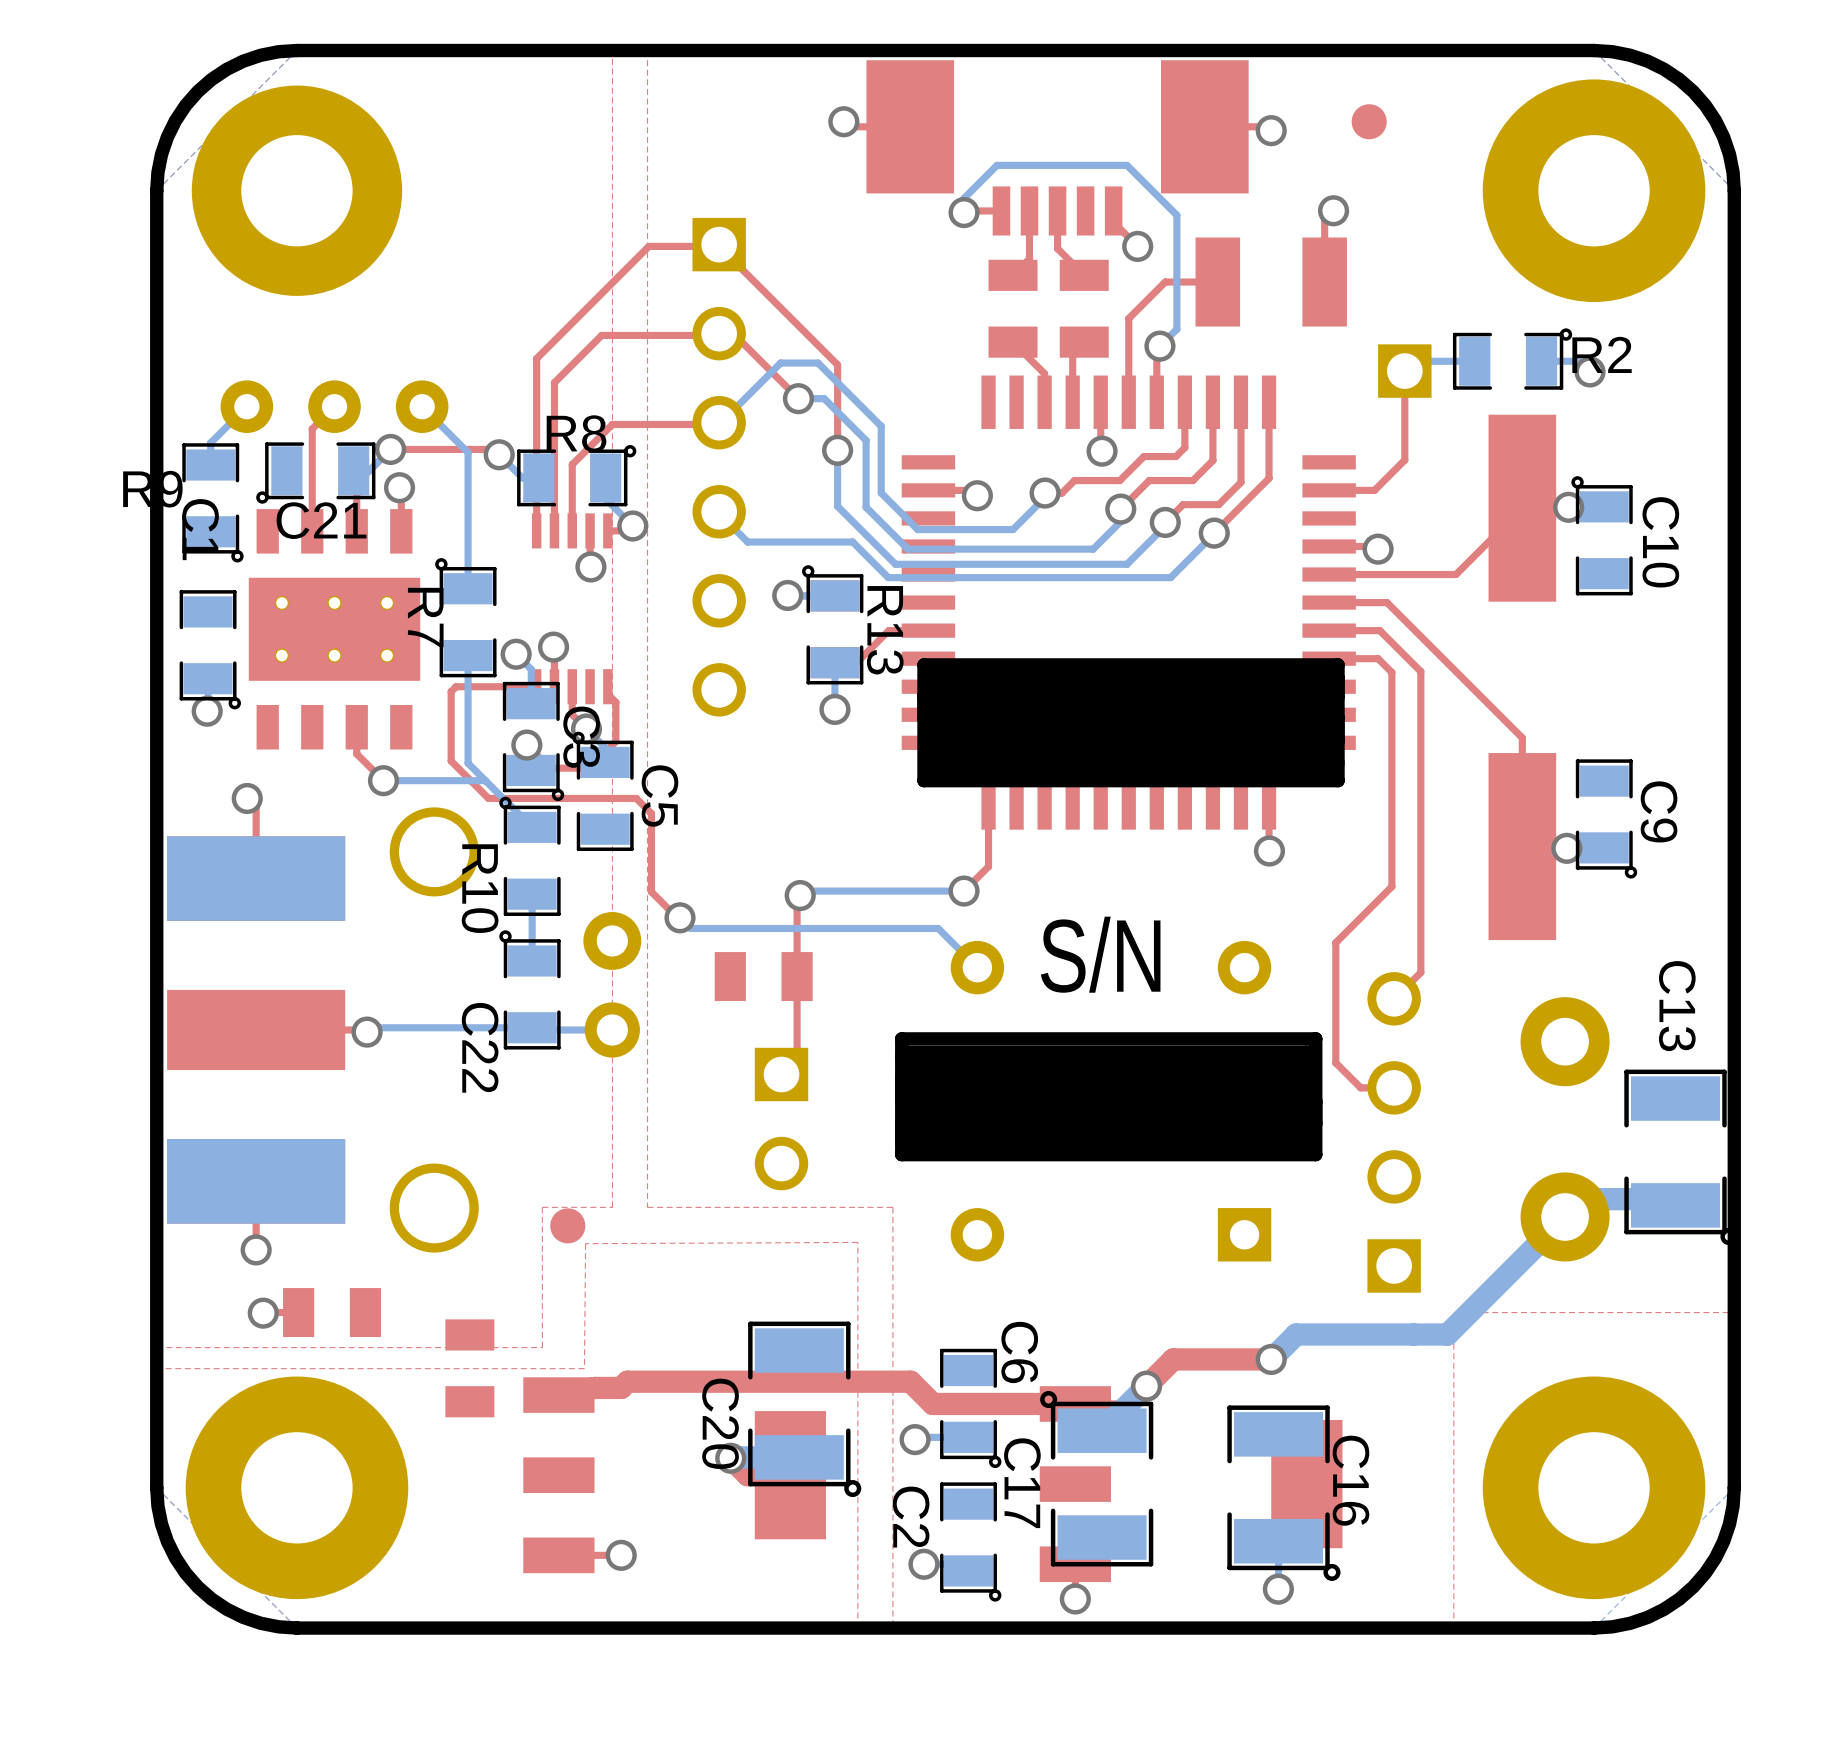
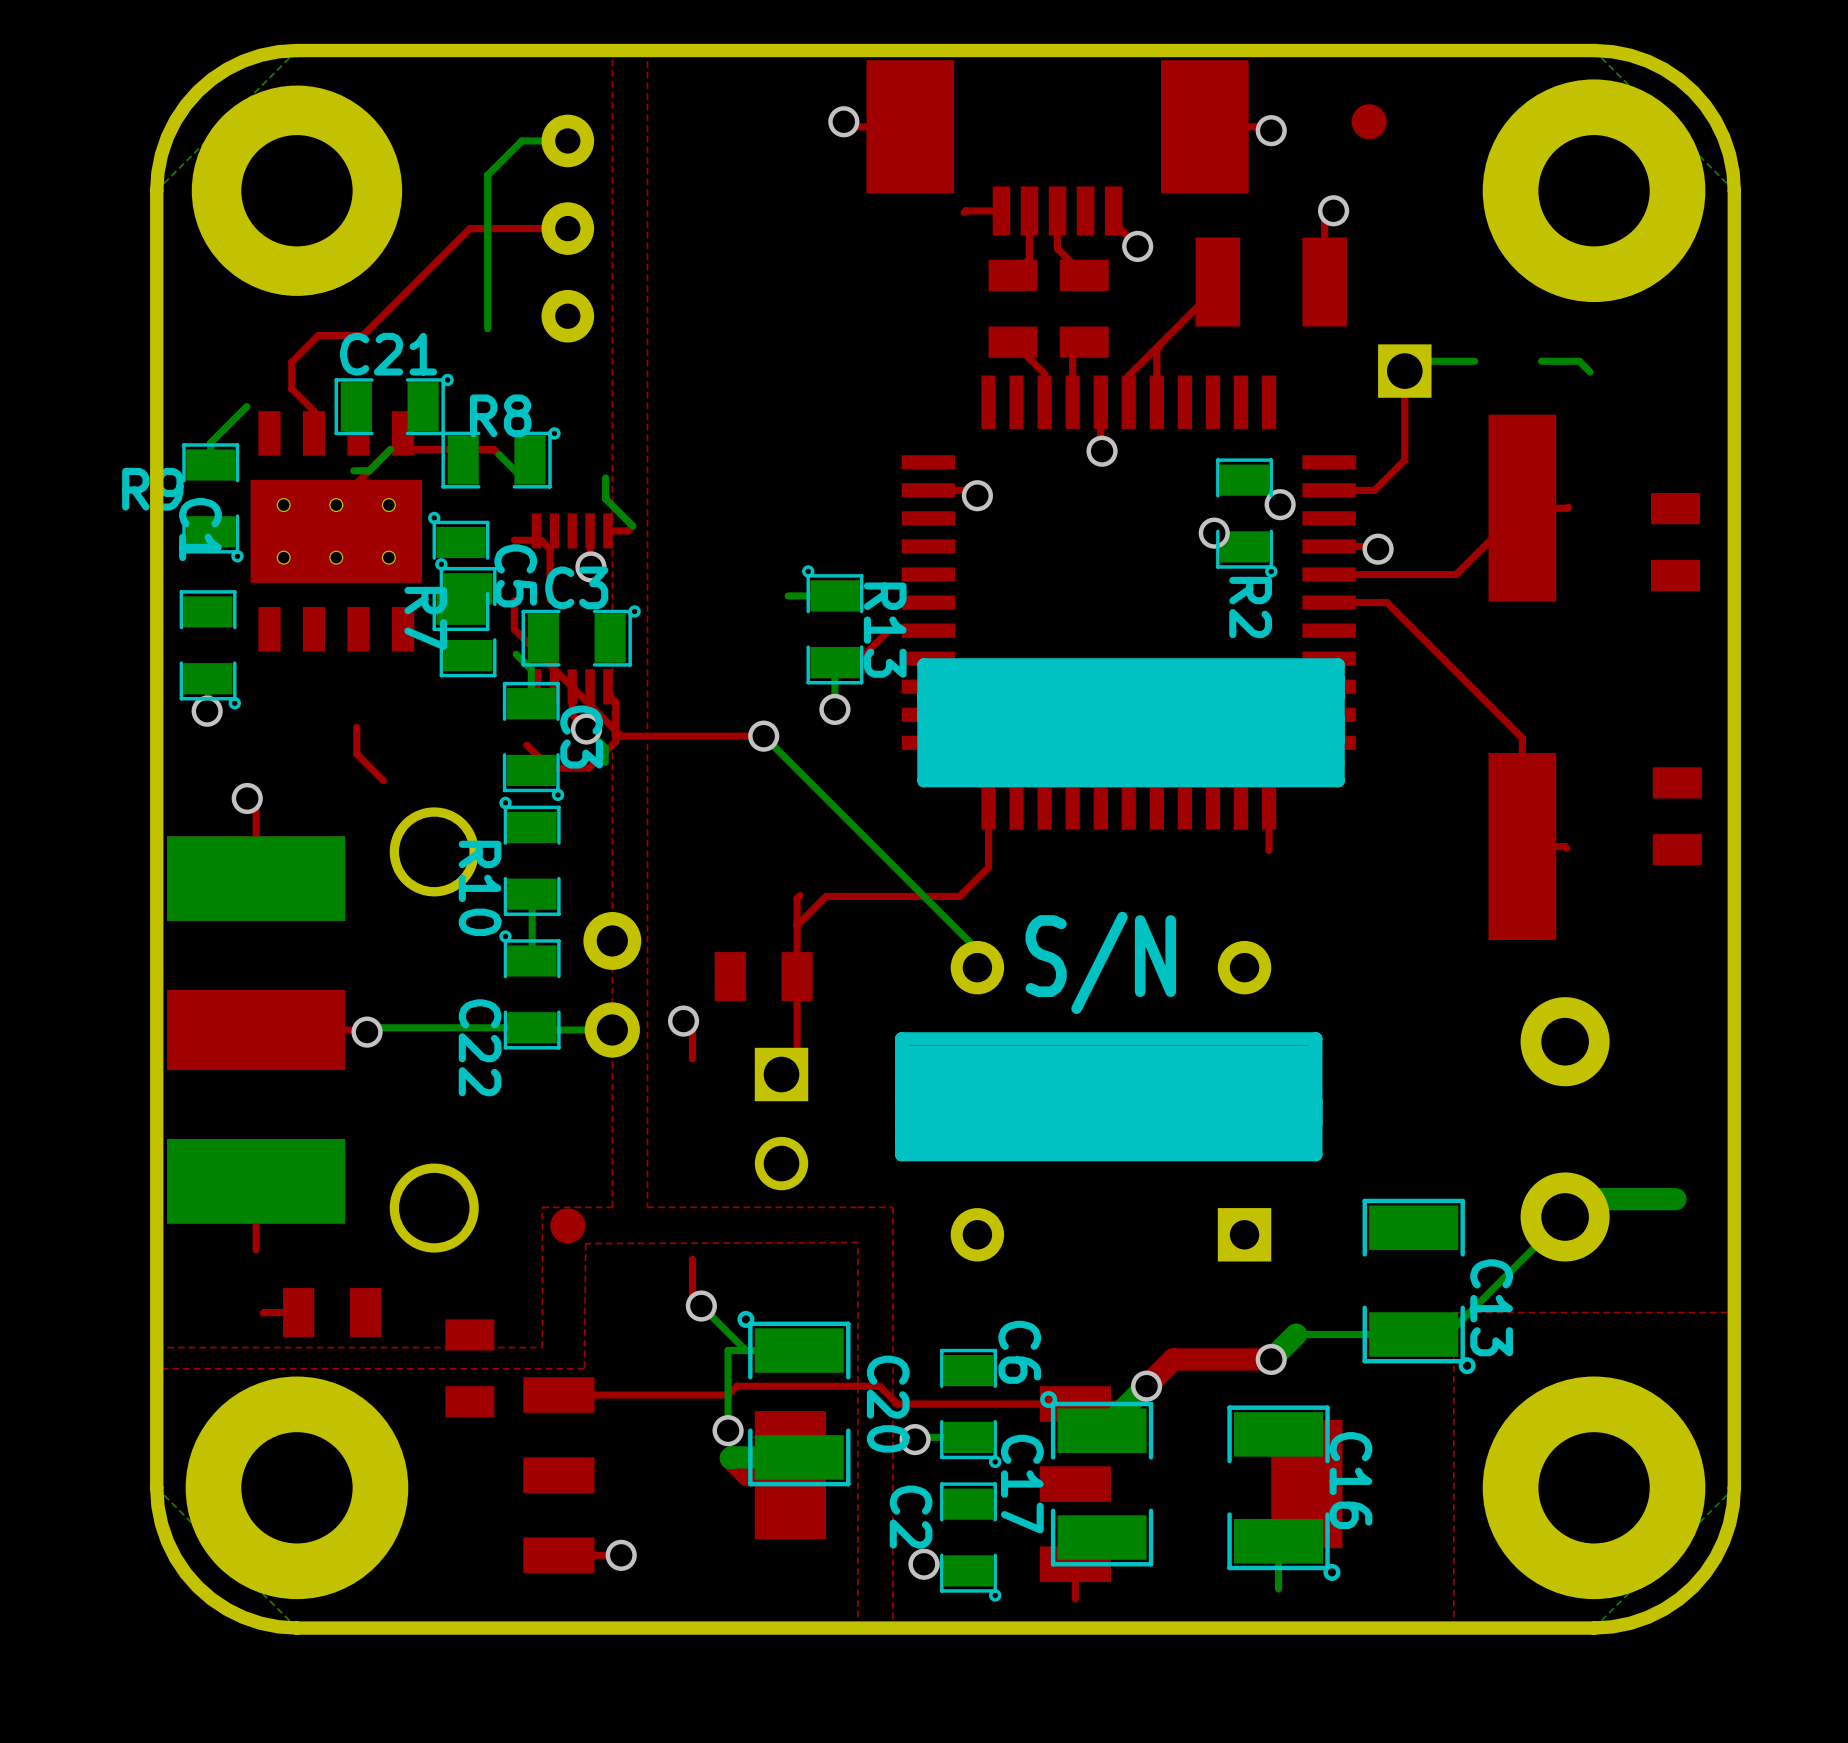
bottom track: none -> (567, 140) (521, 140) (487, 175) (487, 328)
bottom track: (964, 212) (964, 198) (997, 165) (1127, 165) (1176, 215) (1176, 329) (1159, 346) -> none
via: (964, 212) -> none
top track: none -> (567, 228) (469, 228) (363, 335) (318, 335) (291, 362) (291, 388) (314, 411) (314, 433)
top track: (1217, 282) (1165, 282) (1128, 318) (1128, 375) -> (1217, 282) (1217, 286) (1128, 375)
via: (1159, 346) -> none
R2 rotation: 0° (1512, 359) -> 90° clockwise (1246, 517)
R2 position: (1512, 359) -> (1246, 517)
via: (1590, 371) -> none
top track: (798, 398) (735, 335) (601, 335) (554, 382) (554, 530) -> none
bottom track: (798, 398) (824, 398) (866, 440) (866, 507) (907, 549) (1093, 549) (1120, 521) (1120, 509) -> none
via: (798, 398) -> none
top track: (1184, 402) (1184, 447) (1175, 456) (1143, 456) (1119, 480) (1074, 480) (1062, 493) (1045, 493) -> none
top track: (1212, 402) (1212, 460) (1192, 480) (1149, 480) (1120, 509) -> none
top track: (1240, 402) (1240, 482) (1218, 504) (1183, 504) (1165, 522) -> none
top track: (1269, 402) (1269, 478) (1214, 533) -> none
top track: (334, 406) (312, 428) (312, 531) -> none
part rotation: 0° (334, 406) -> 90° clockwise (567, 228)
part position: (334, 406) -> (567, 228)
bottom track: (422, 406) (468, 452) (468, 588) -> none
top track: (719, 424) (612, 424) (572, 464) (572, 530) -> none
bottom track: (719, 424) (780, 363) (818, 363) (881, 426) (881, 493) (917, 529) (1013, 529) (1045, 497) (1045, 493) -> none
via: (390, 449) -> none
top track: (837, 450) (837, 364) (719, 246) (648, 246) (536, 358) (536, 530) -> none
bottom track: (837, 450) (837, 506) (895, 564) (1127, 564) (1165, 526) (1165, 522) -> none
via: (837, 450) -> none
via: (499, 454) -> none
part: (719, 467) -> none
C21 rotation: 0° (315, 473) -> 180° (394, 404)
C21 position: (315, 473) -> (394, 404)
R8 position: (576, 475) -> (501, 457)
via: (399, 487) -> none
via: (1045, 493) -> none
via: none -> (1280, 504)
via: (1568, 507) -> none
via: (1120, 509) -> none
bottom track: (719, 513) (747, 542) (852, 542) (888, 577) (1170, 577) (1214, 533) -> none
via: (1165, 522) -> none
via: (632, 526) -> none
C10 side: bottom (1602, 535) -> top (1675, 542)
top track: none -> (514, 540) (541, 540) (550, 549) (550, 600)
via: (787, 595) -> none
top track: none -> (514, 600) (514, 629) (621, 736) (763, 736)
part position: (334, 629) -> (336, 531)
top track: (1329, 630) (1379, 630) (1420, 671) (1420, 972) (1394, 998) -> none
C3: none -> (581, 635)
via: (553, 647) -> none
via: (516, 654) -> none
bottom track: (468, 655) (468, 763) (532, 827) -> none
top track: (1329, 658) (1378, 658) (1391, 672) (1391, 886) (1335, 942) (1335, 1062) (1360, 1087) (1394, 1087) -> none
top track: (536, 686) (456, 686) (451, 691) (451, 761) (488, 798) (636, 798) (651, 813) (651, 891) (677, 917) (680, 917) -> none
via: none -> (763, 736)
via: (526, 745) -> none
via: (383, 780) -> none
bottom track: (485, 780) (383, 780) -> none
C5 position: (602, 791) -> (458, 571)
C9 side: bottom (1606, 818) -> top (1677, 816)
via: (1566, 848) -> none
via: (1269, 851) -> none
top track: (988, 866) (964, 891) -> (988, 866) (959, 896) (826, 896) (797, 925)
bottom track: (964, 891) (804, 891) (800, 895) -> none
via: (964, 891) -> none
via: (800, 895) -> none
bottom track: (680, 917) (690, 928) (938, 928) (977, 967) -> (763, 736) (977, 949) (977, 967)
via: (680, 917) -> none
C13 name position: C13 (1677, 1006) -> C13 (1491, 1307)
top track: none -> (683, 1021) (692, 1029) (692, 1058)
via: none -> (683, 1021)
part: (1394, 1132) -> none
C13 position: (1680, 1157) -> (1419, 1286)
bottom track width: thick (1565, 1216) (1447, 1334) (1296, 1334) -> thin (1565, 1216) (1447, 1334) (1296, 1334)
via: (256, 1249) -> none
top track: none -> (692, 1259) (692, 1297) (701, 1306)
bottom track: none -> (701, 1306) (745, 1350)
via: none -> (701, 1306)
via: (263, 1313) -> none
bottom track: none -> (799, 1350) (728, 1350) (728, 1430)
top track: (558, 1395) (594, 1387) (621, 1387) (627, 1381) (910, 1381) (932, 1403) -> (558, 1395) (728, 1395) (736, 1386) (879, 1386) (897, 1403) (932, 1403)
top track width: thick (1075, 1403) (932, 1403) -> thin (1075, 1403) (932, 1403)
C20 rotation: 0° (804, 1409) -> 180° (793, 1398)
via position: (730, 1458) -> (728, 1430)
via: (1278, 1589) -> none
via: (1075, 1598) -> none

